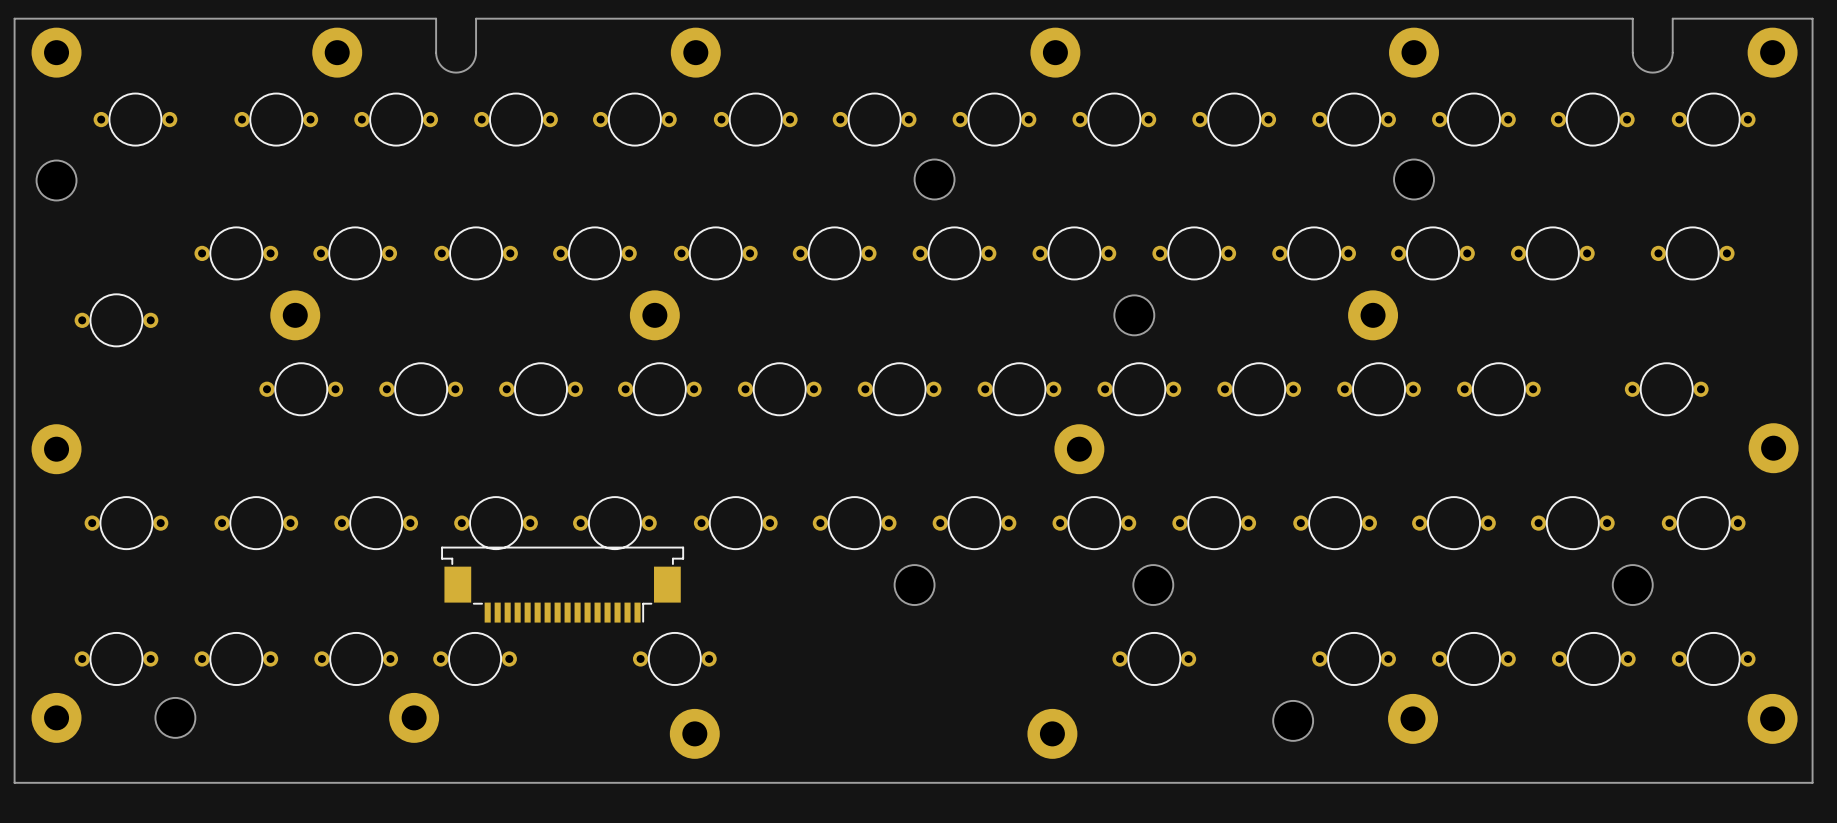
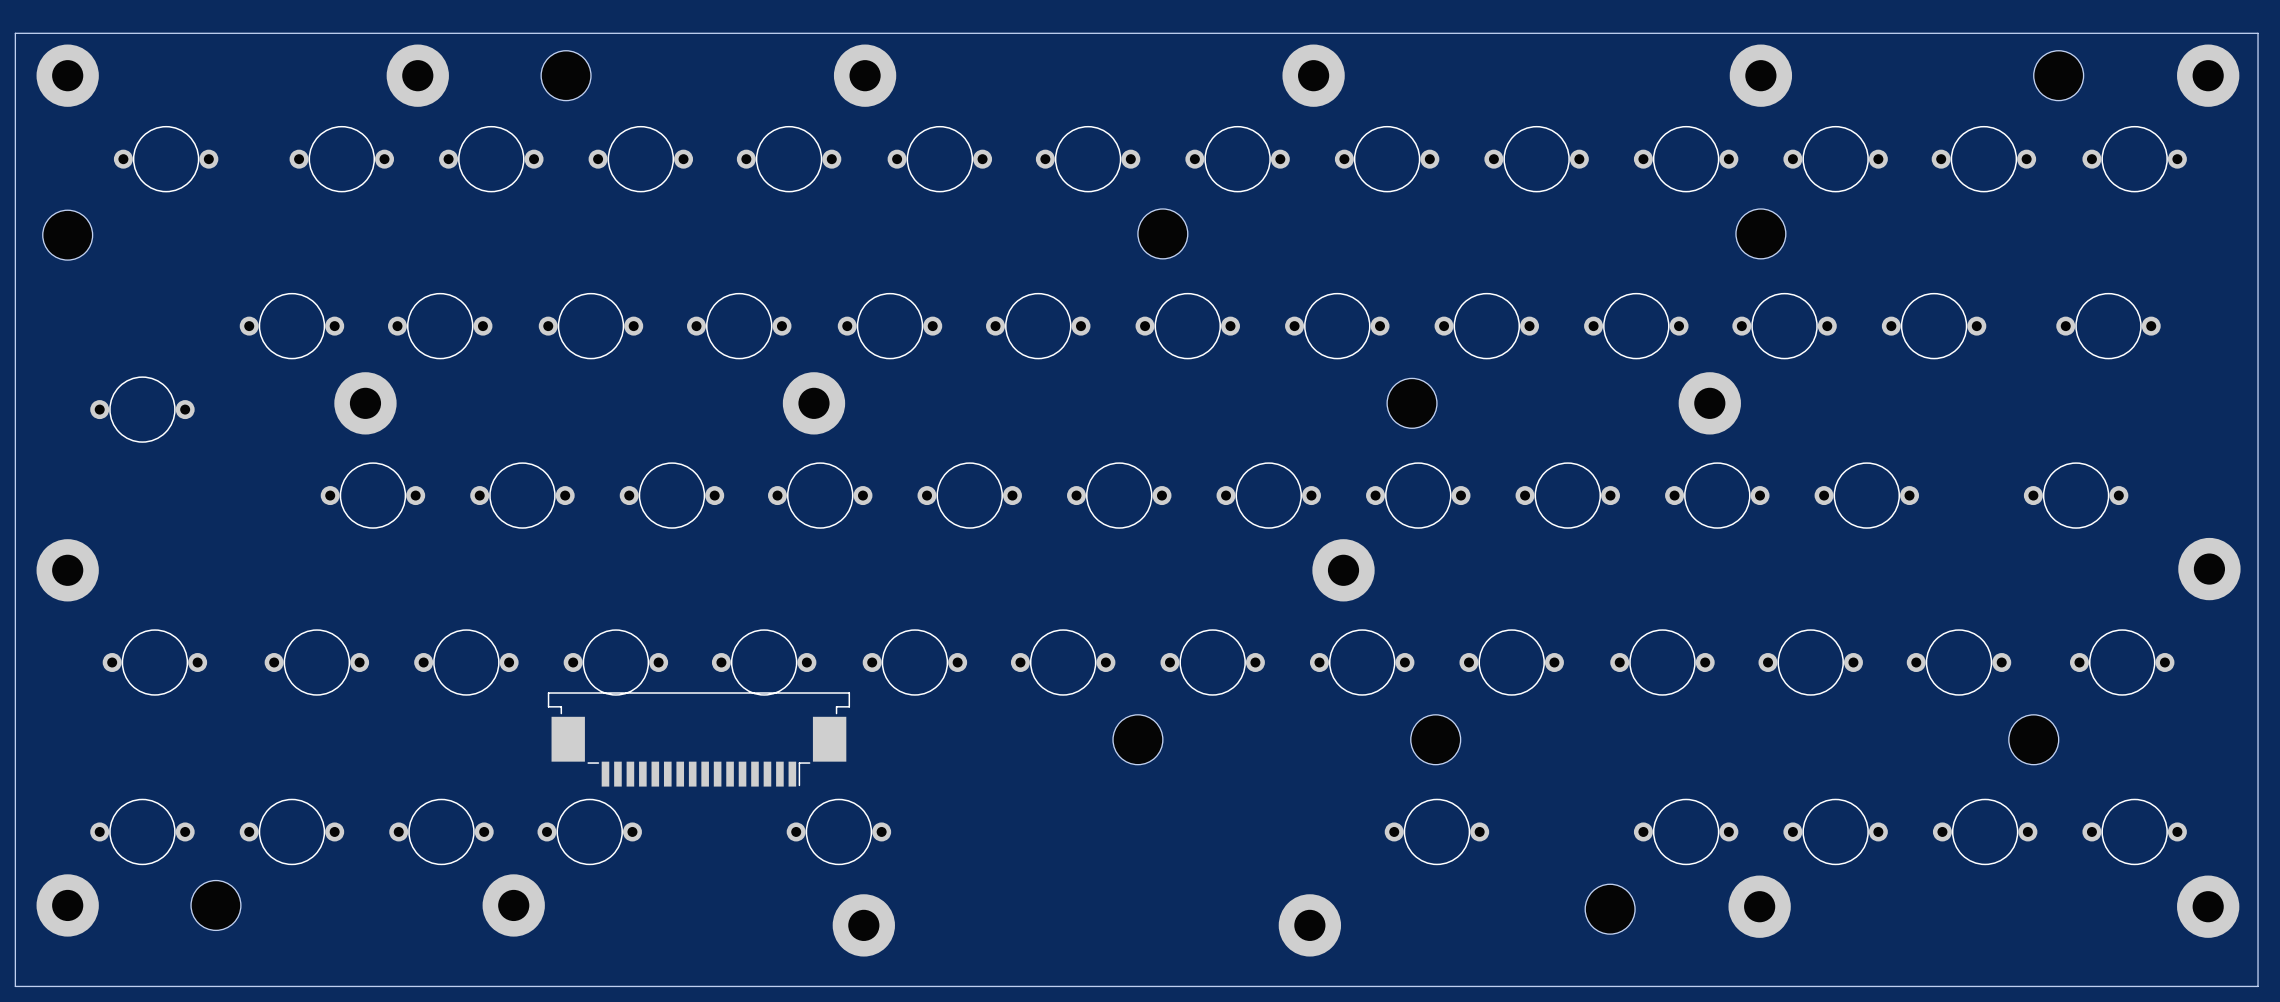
board edge: (436, 18) (437, 60) (446, 69) (456, 72) (466, 69) (474, 60) (476, 18) -> (541, 33) (590, 33)
board edge: (1632, 18) (1634, 60) (1642, 69) (1652, 72) (1662, 69) (1671, 60) (1672, 18) -> (2033, 33) (2083, 33)
part: none -> (566, 75)
part: none -> (2058, 75)

